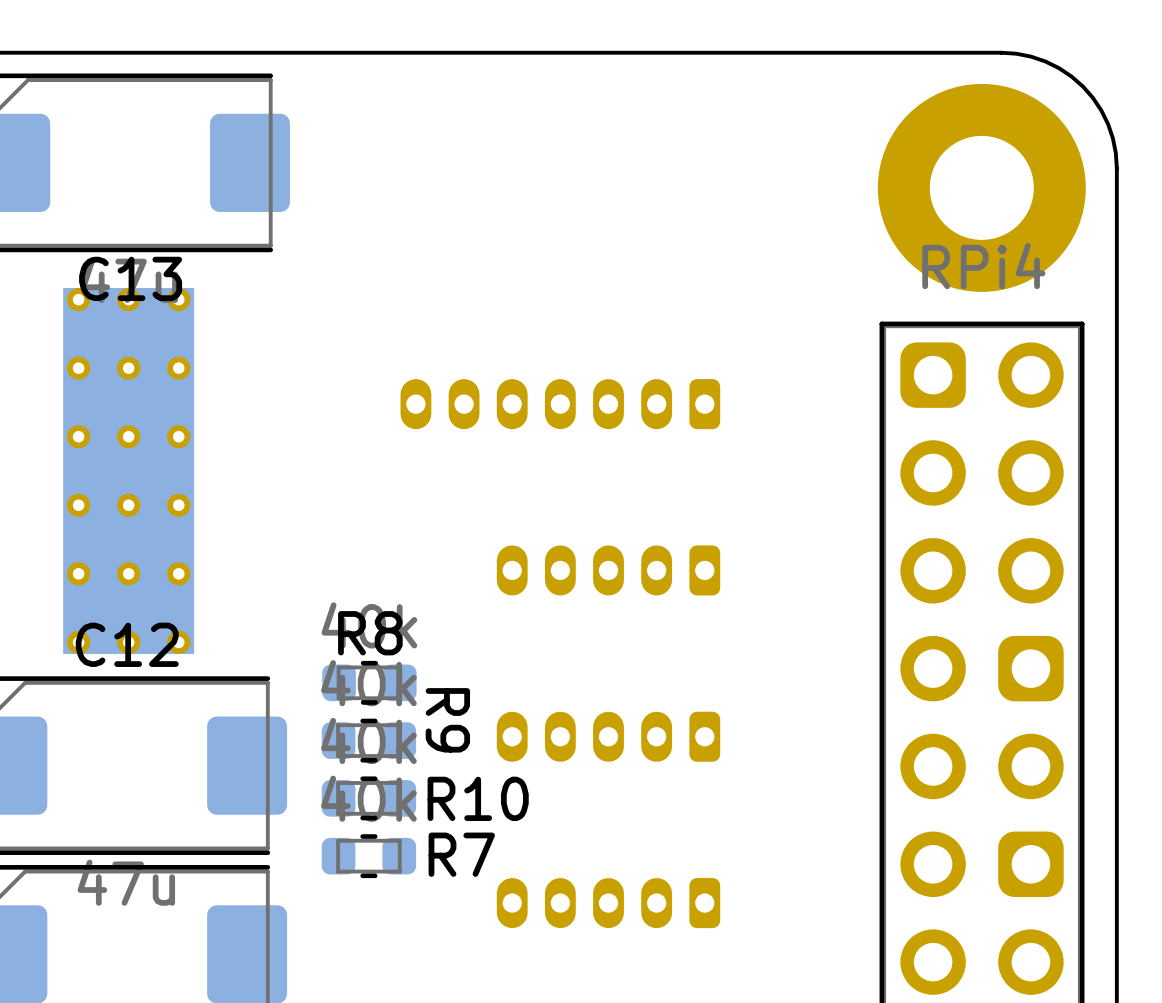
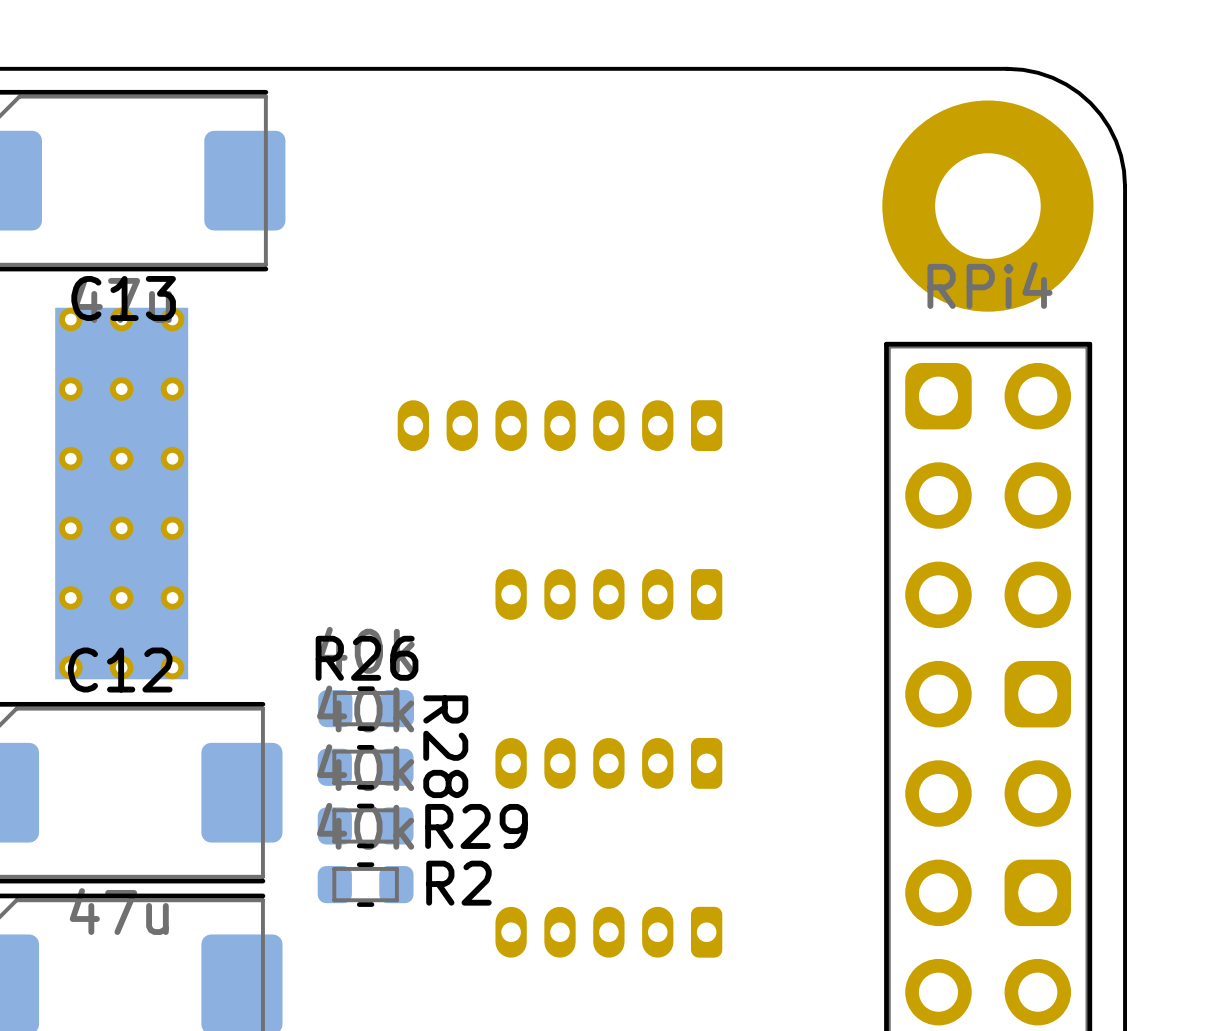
R8 name: R8 (370, 633) -> R26 (367, 658)
R9 name: R9 (447, 720) -> R28 (445, 746)
R10 name: R10 (478, 798) -> R29 (476, 826)
R7 name: R7 (461, 854) -> R2 (458, 883)

